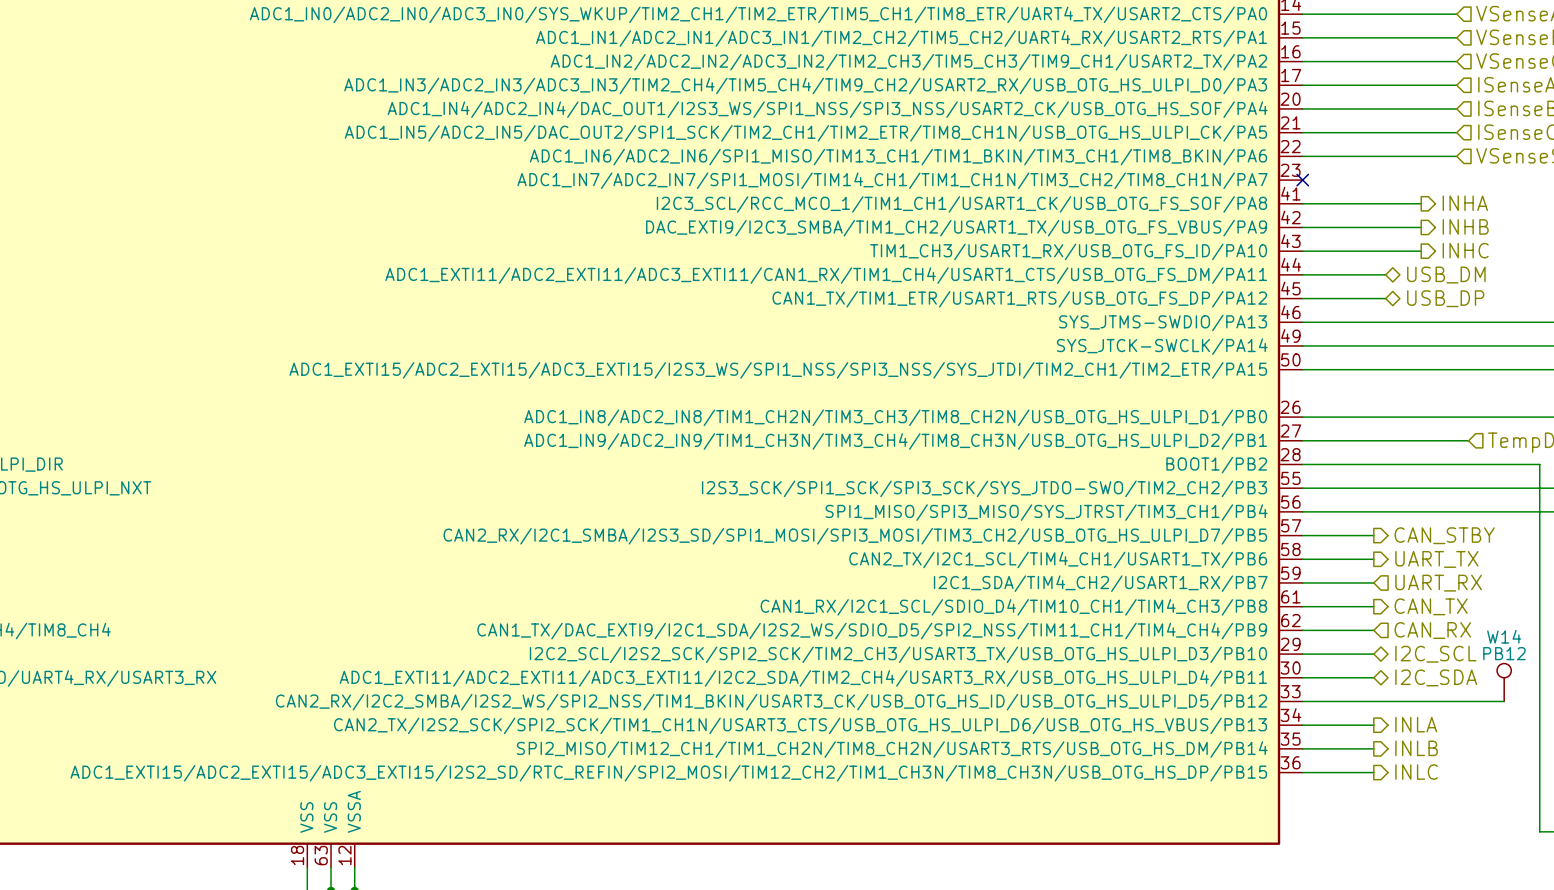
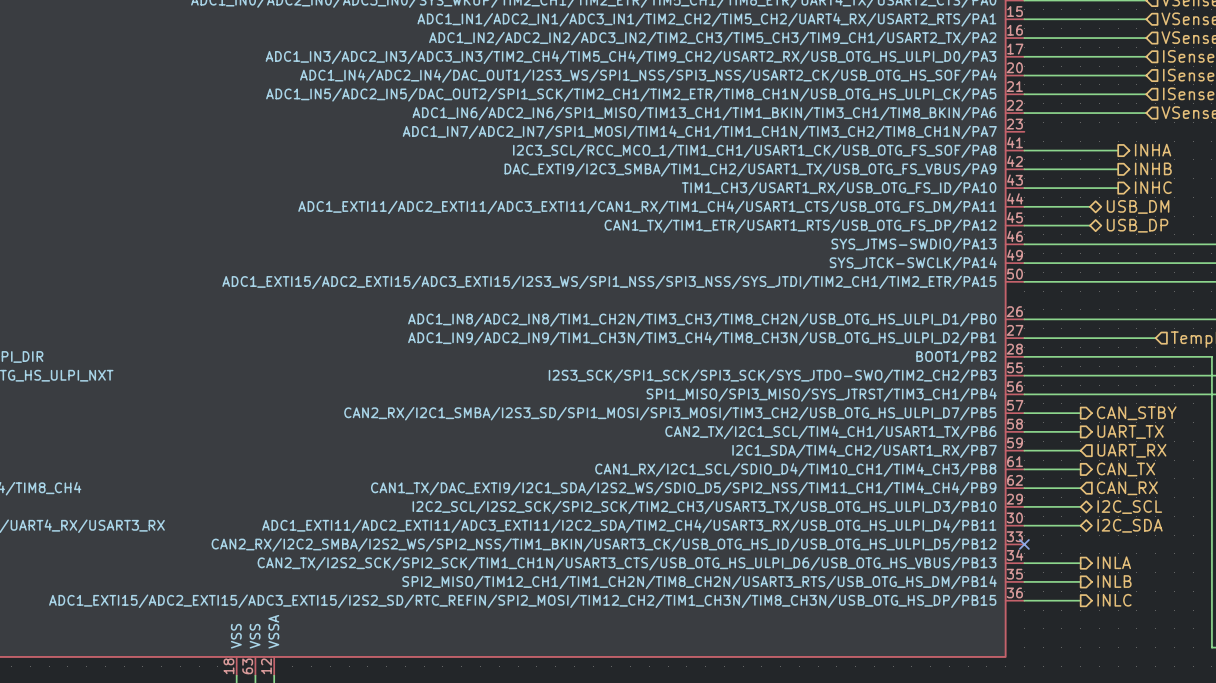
no-connect mark: (1302, 180) -> none
W14: PB12 (1504, 682) -> none
wire: (1302, 701) (1504, 701) -> none
no-connect mark: none -> (1024, 544)

